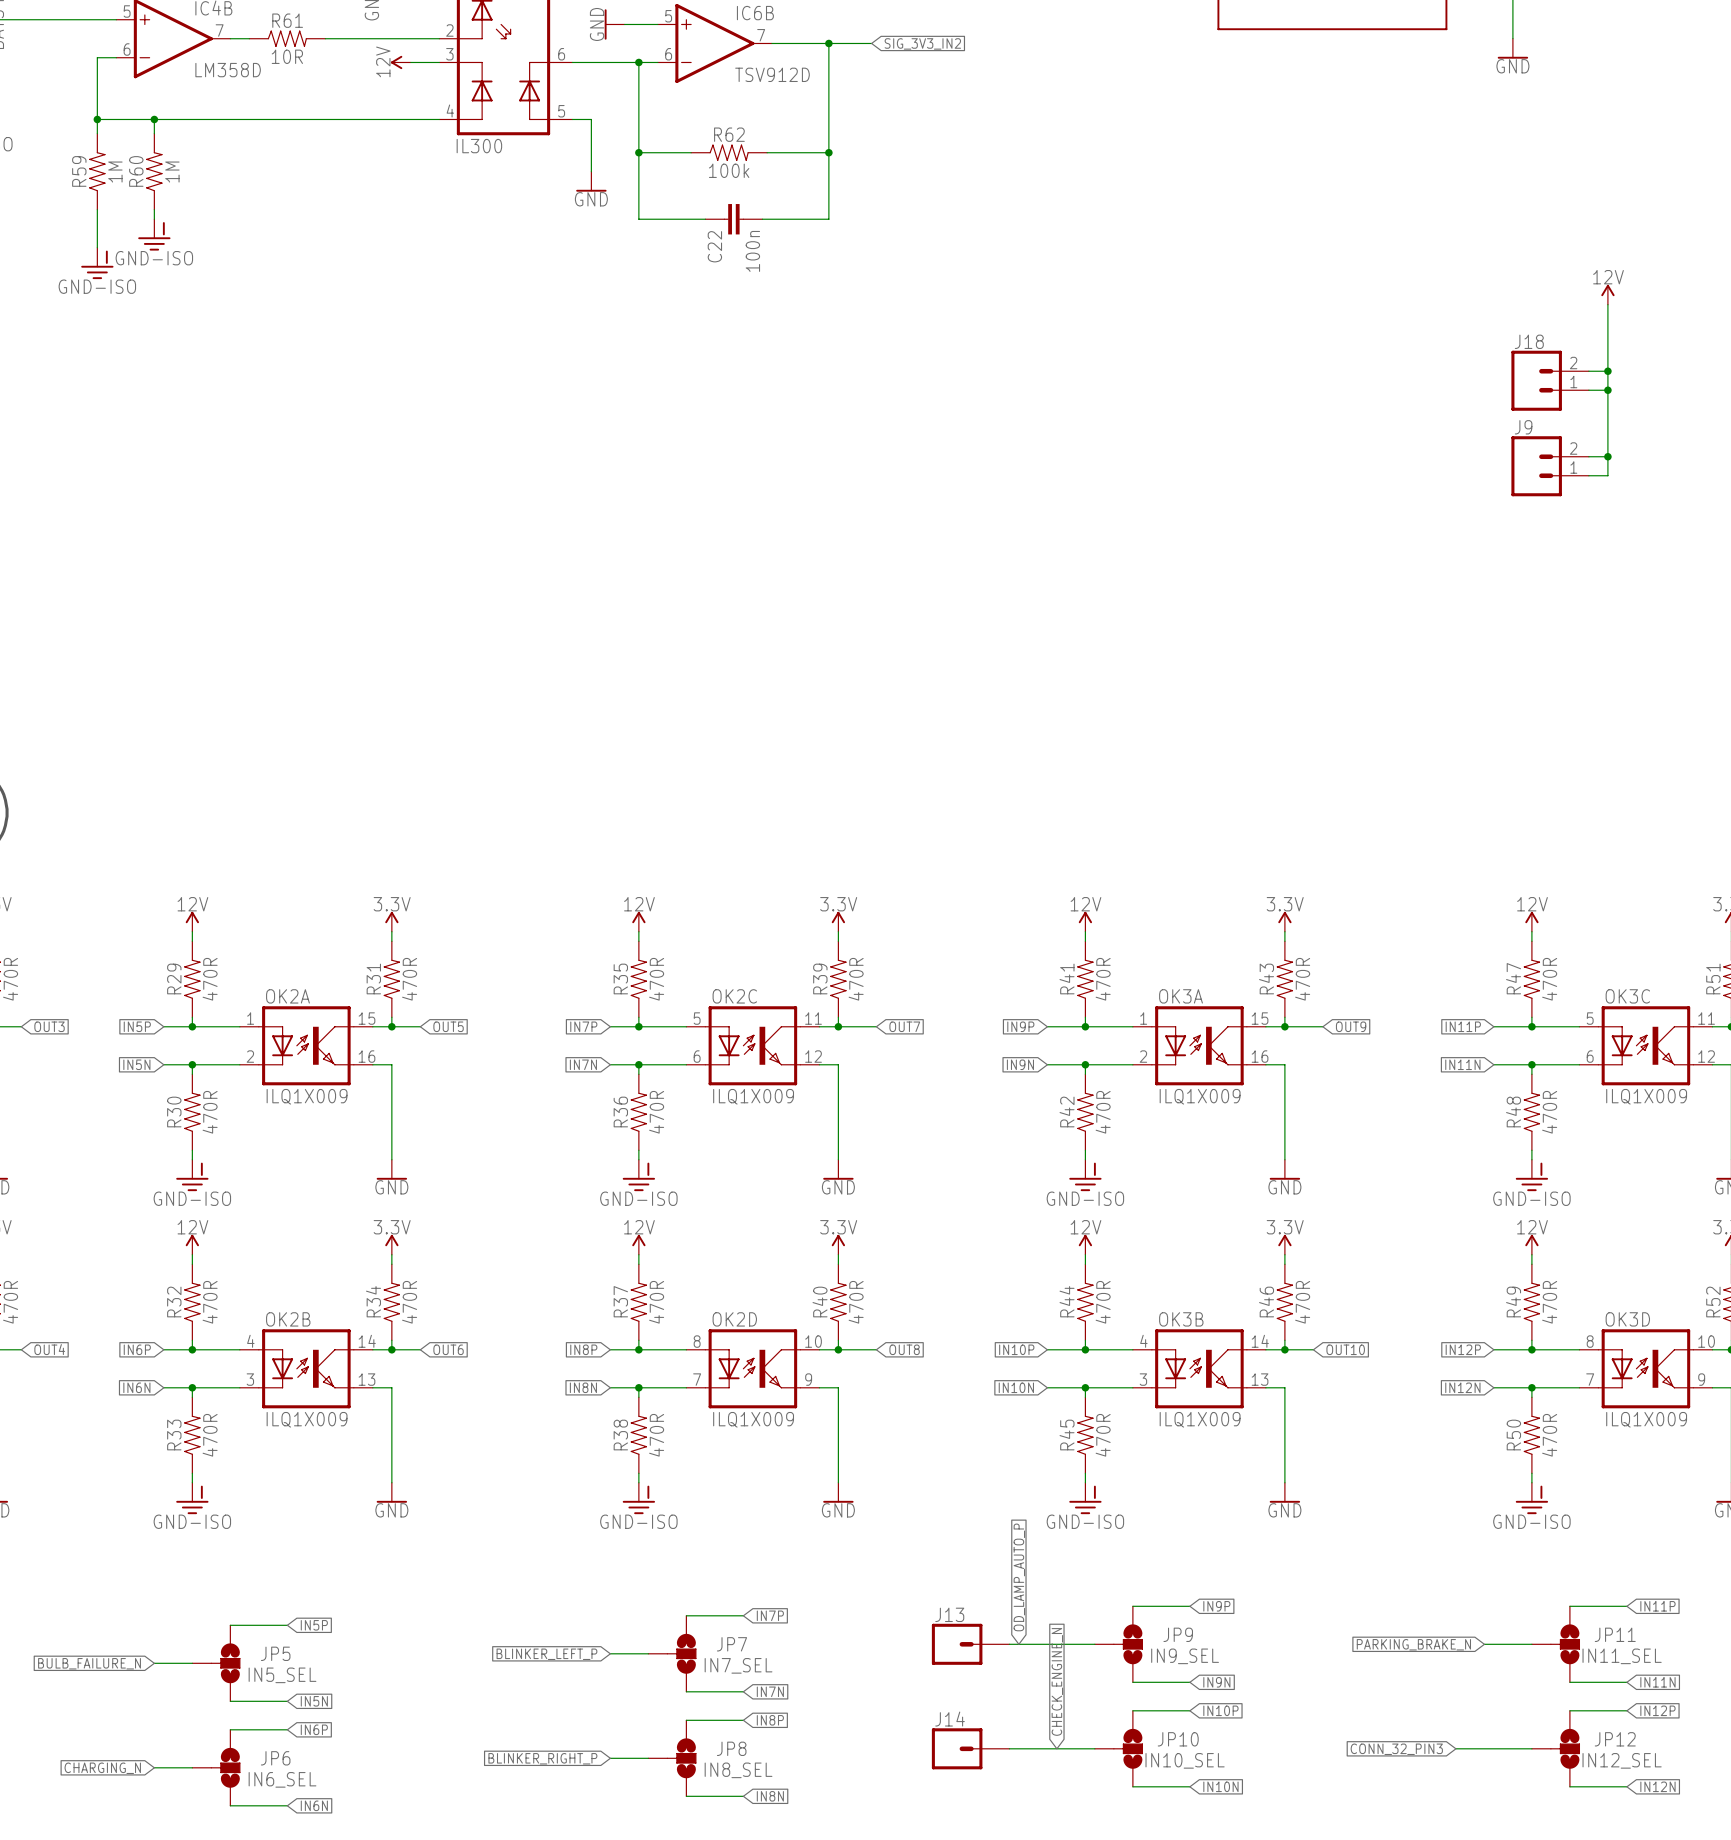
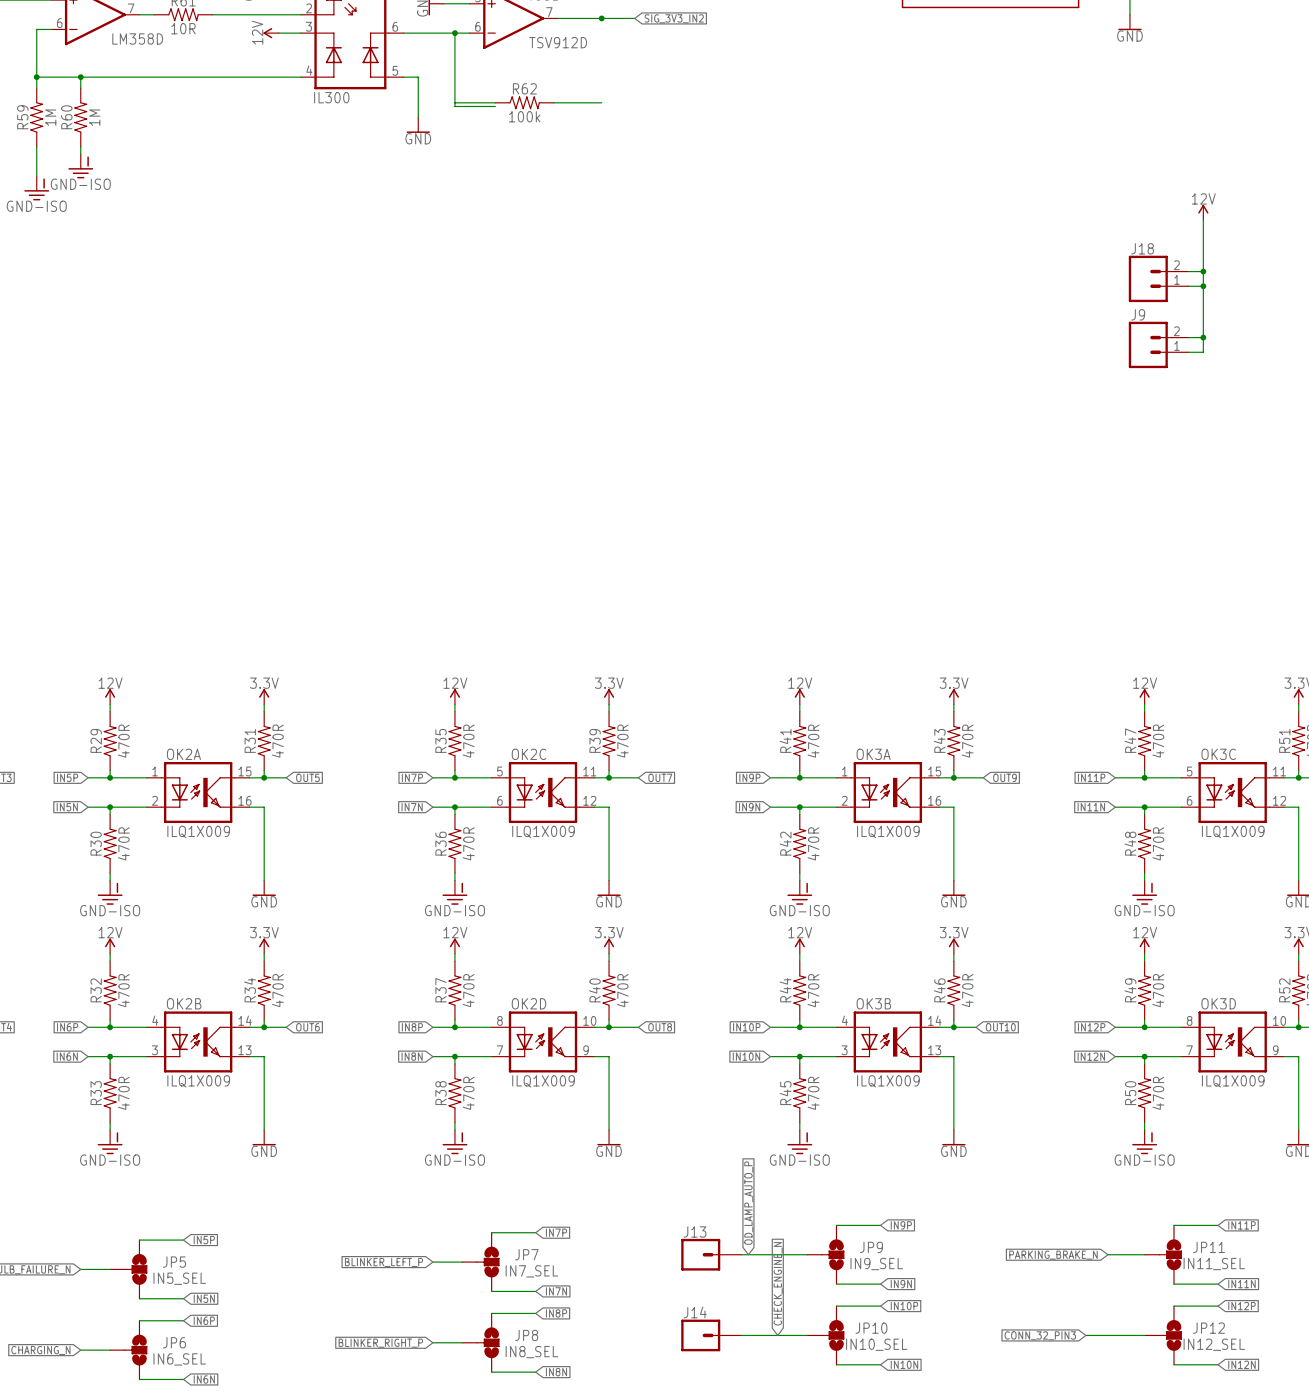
wire: (828, 43) (828, 219) (762, 219) -> none
junction: (638, 152) -> none
junction: (828, 152) -> none
wire: (638, 157) (638, 219) (705, 219) -> (454, 106) (495, 106)
C22: 100n (733, 219) -> none

